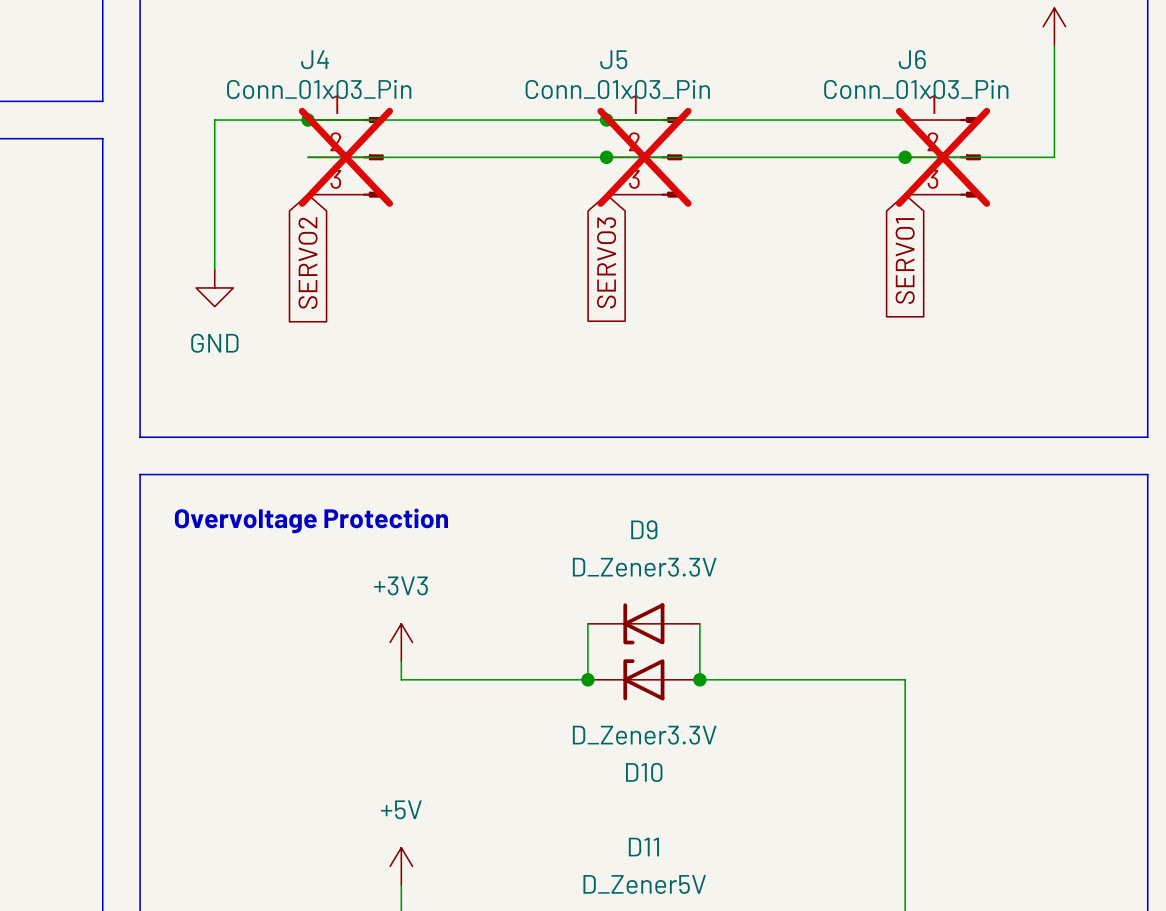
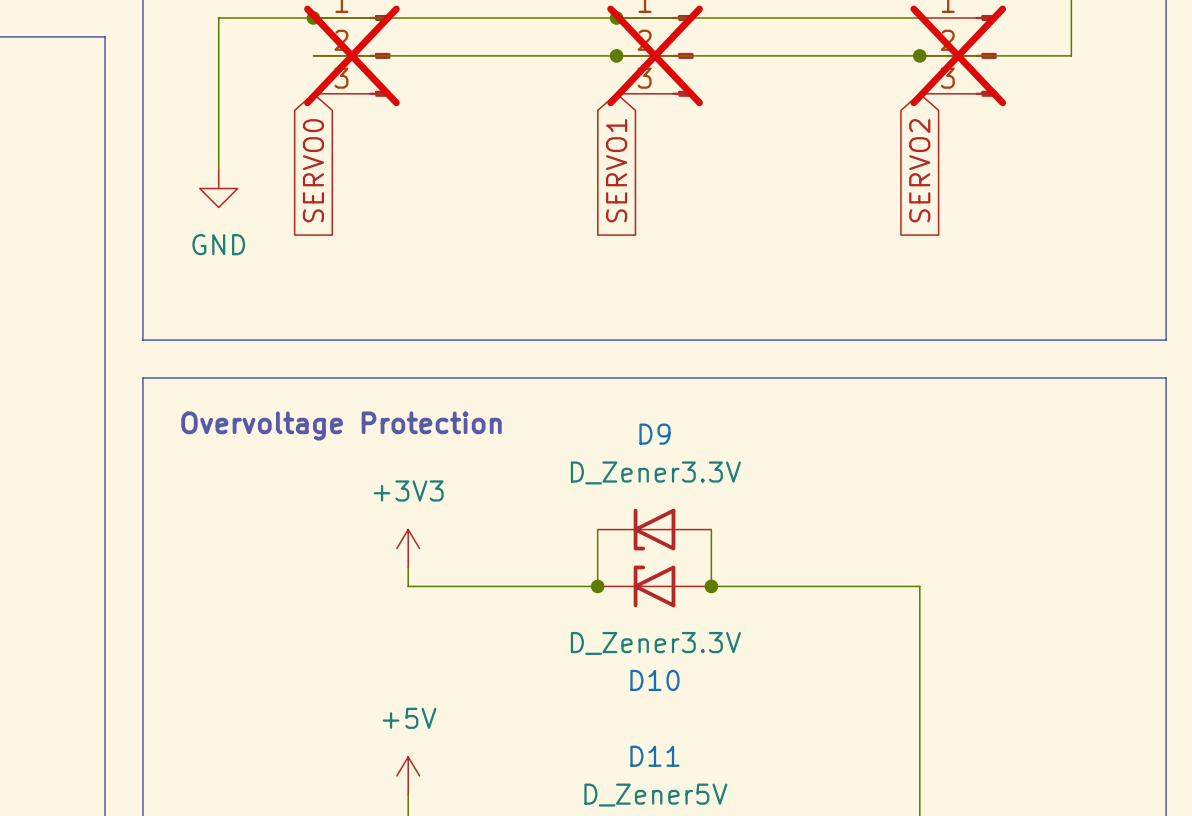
global label: SERVO1 (905, 261) -> SERVO2 (919, 170)
global label: SERVO3 (606, 262) -> SERVO1 (616, 170)
global label: SERVO2 (308, 263) -> SERVO0 (313, 170)

